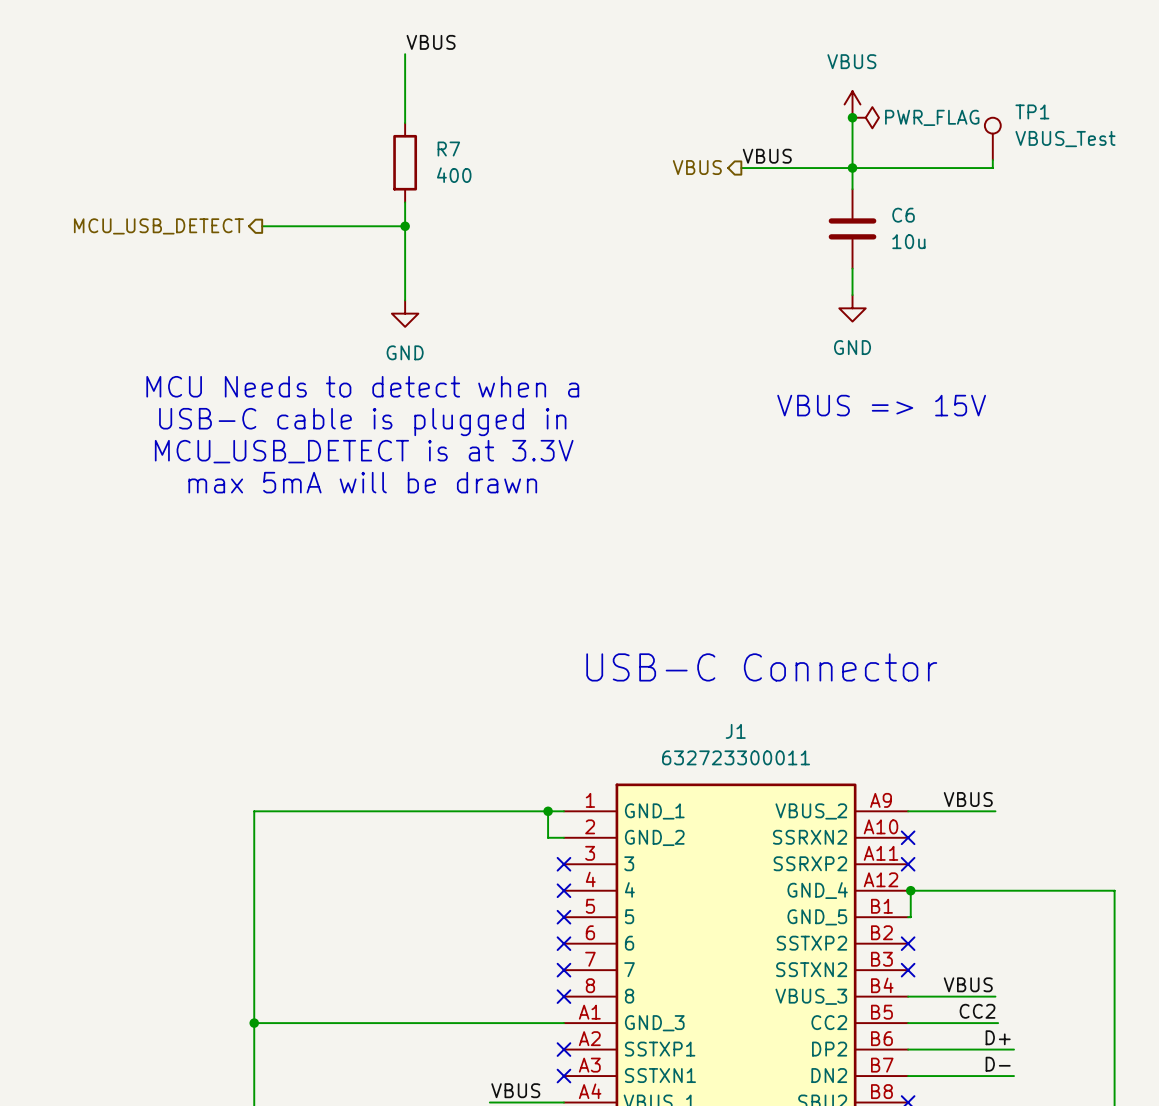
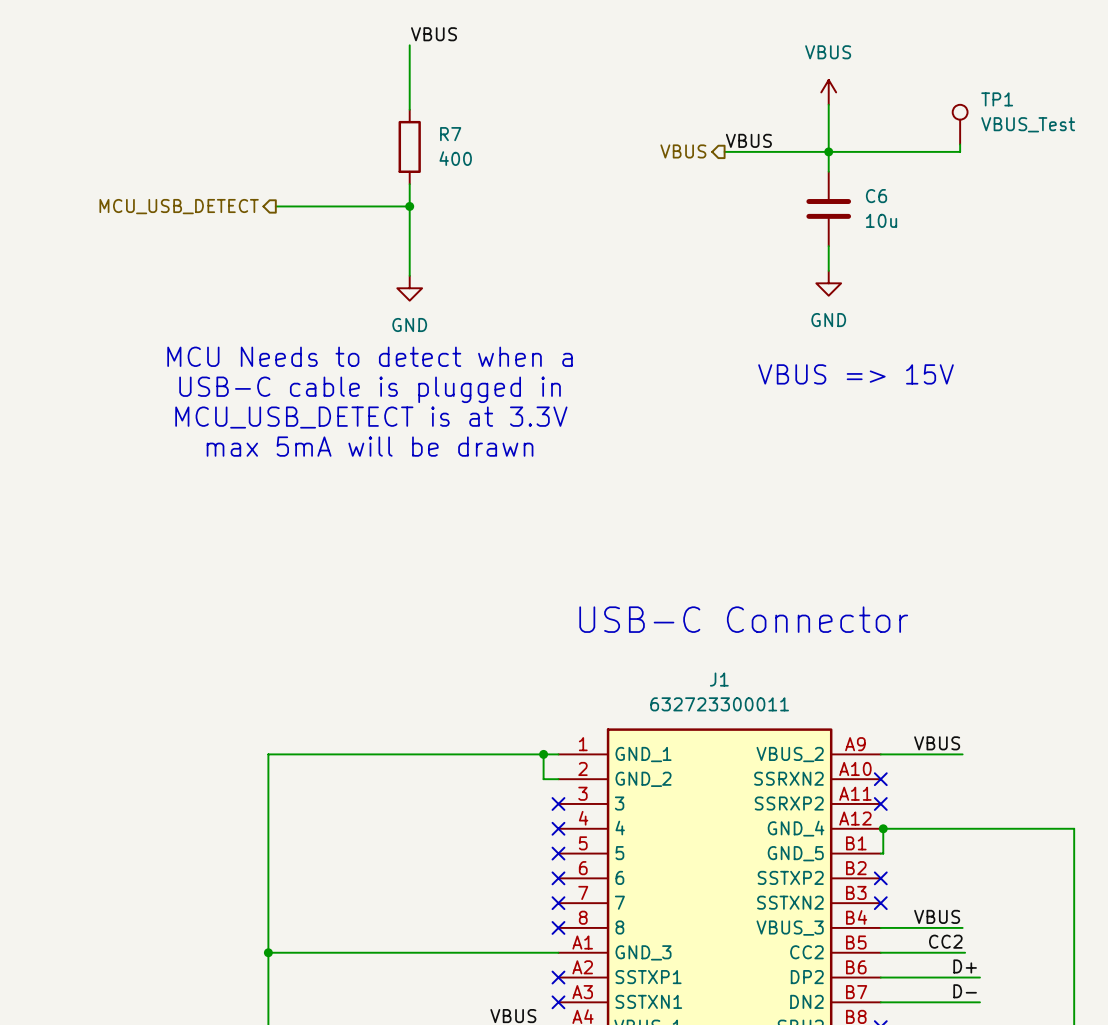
junction: (852, 117) -> none
power symbol: PWR_FLAG (865, 117) -> none

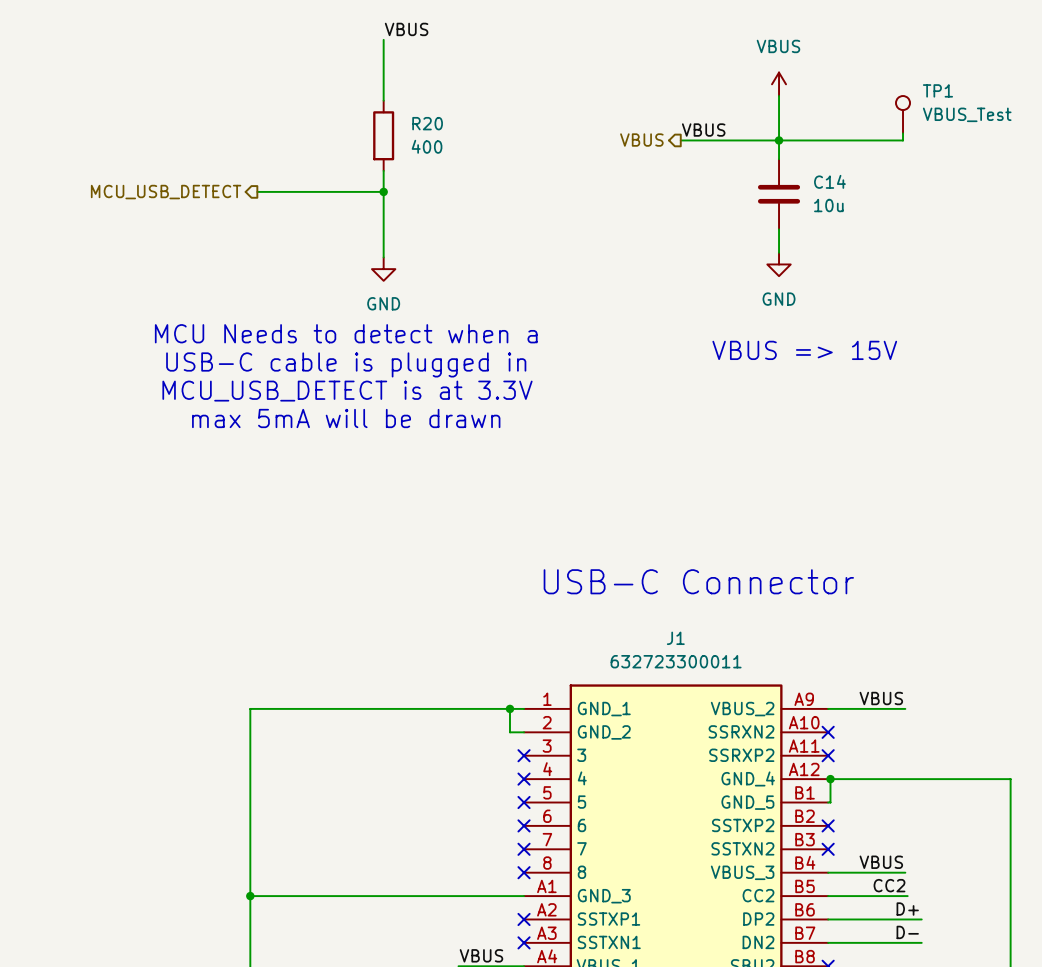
R7 name: R7 (450, 134) -> R20 (427, 123)
C6 name: C6 (876, 196) -> C14 (829, 181)

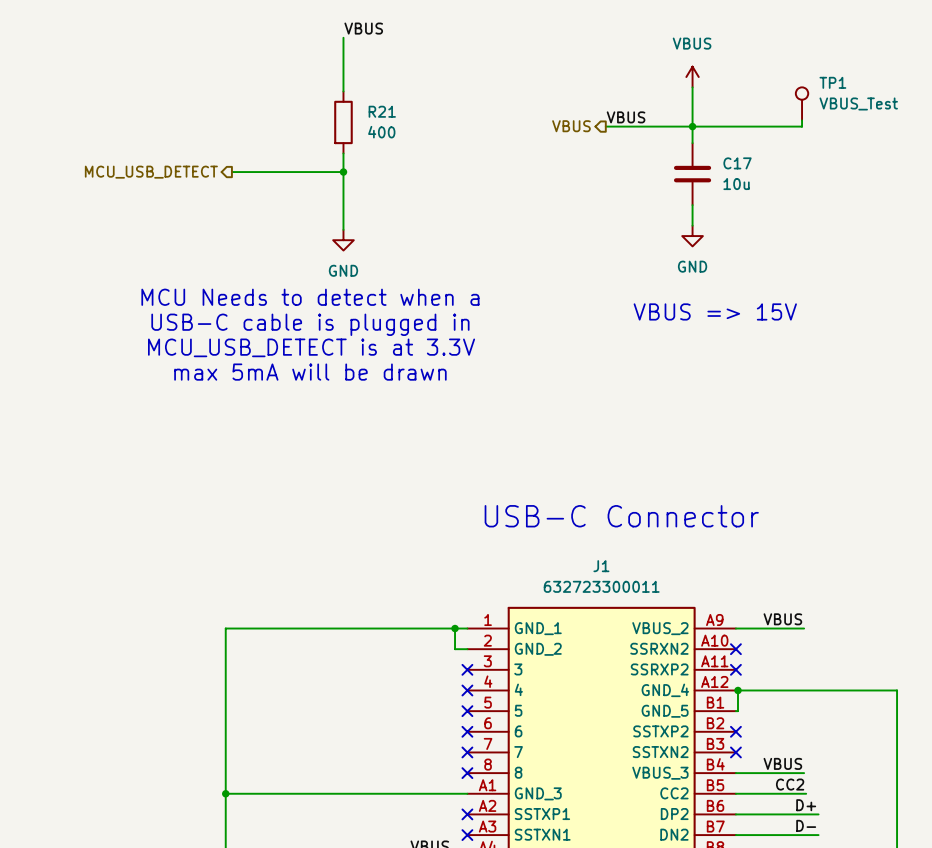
R20 name: R20 (427, 123) -> R21 (382, 111)
C14 name: C14 (829, 181) -> C17 (737, 163)

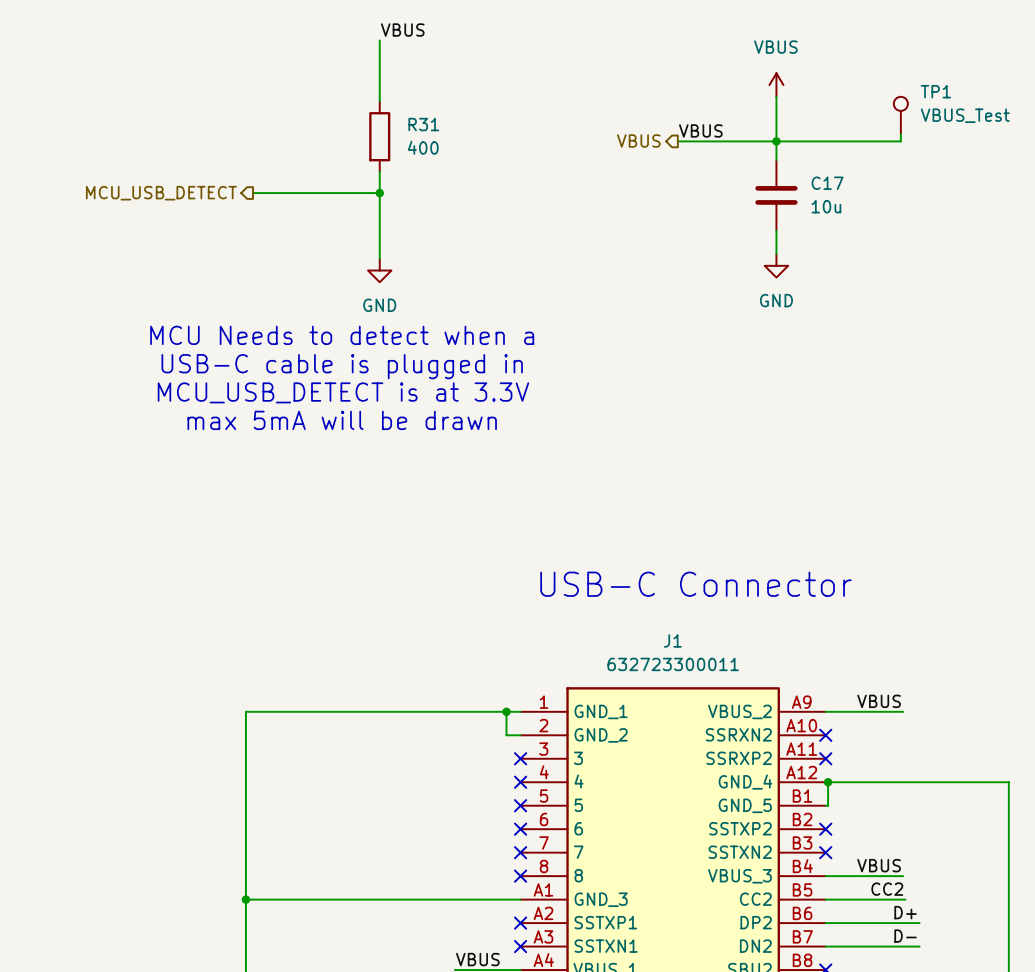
R21 name: R21 (382, 111) -> R31 (423, 124)
text: VBUS => 15V (715, 311) -> none

